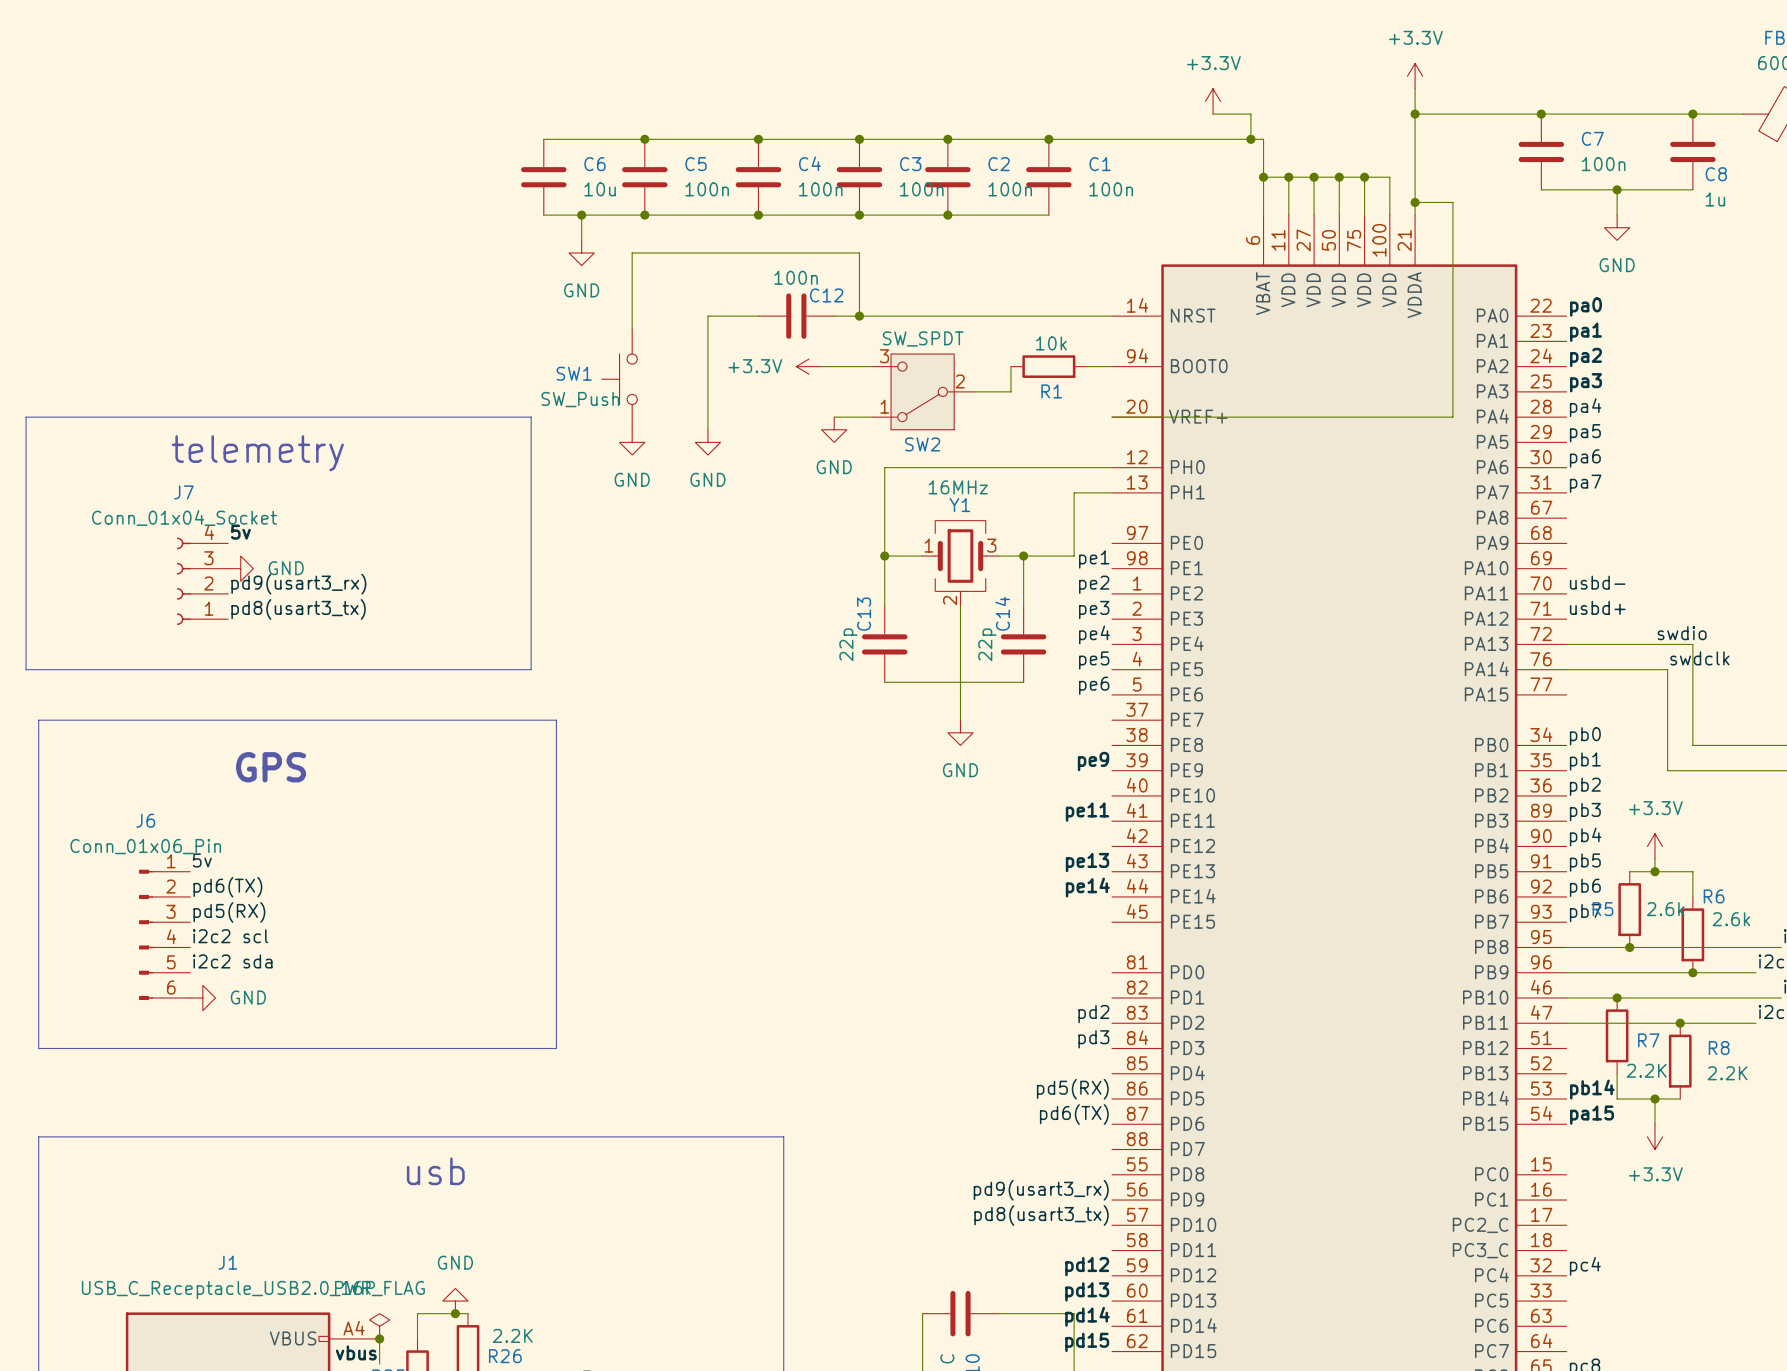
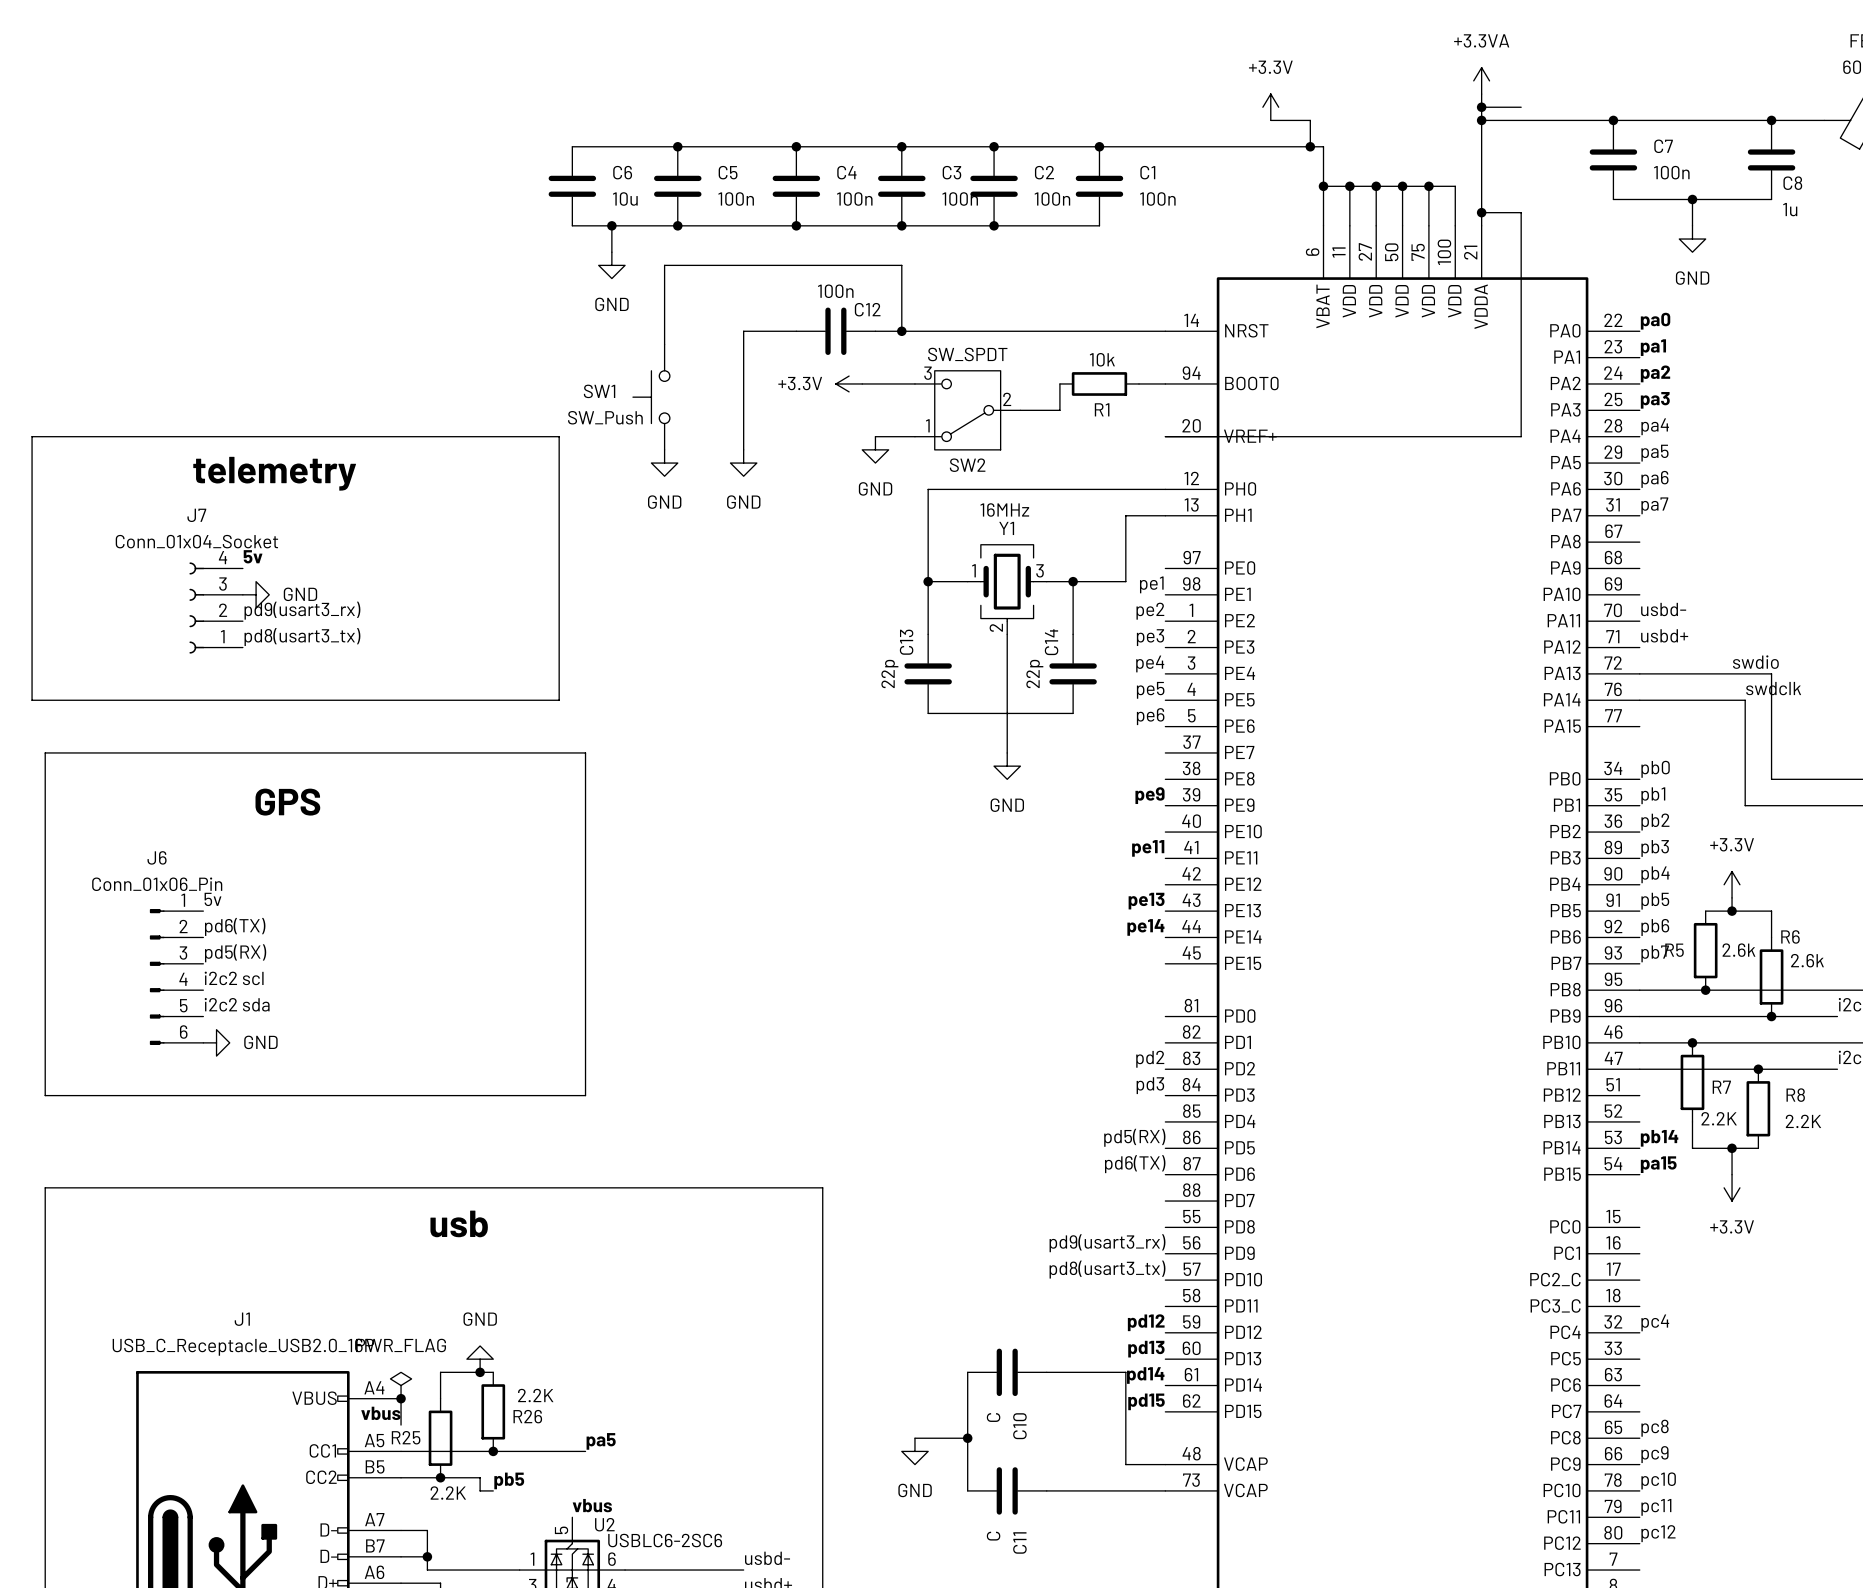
power symbol: +3.3V (1415, 76) -> +3.3VA (1481, 80)
wire: none -> (1481, 107) (1521, 107)
junction: none -> (1481, 107)

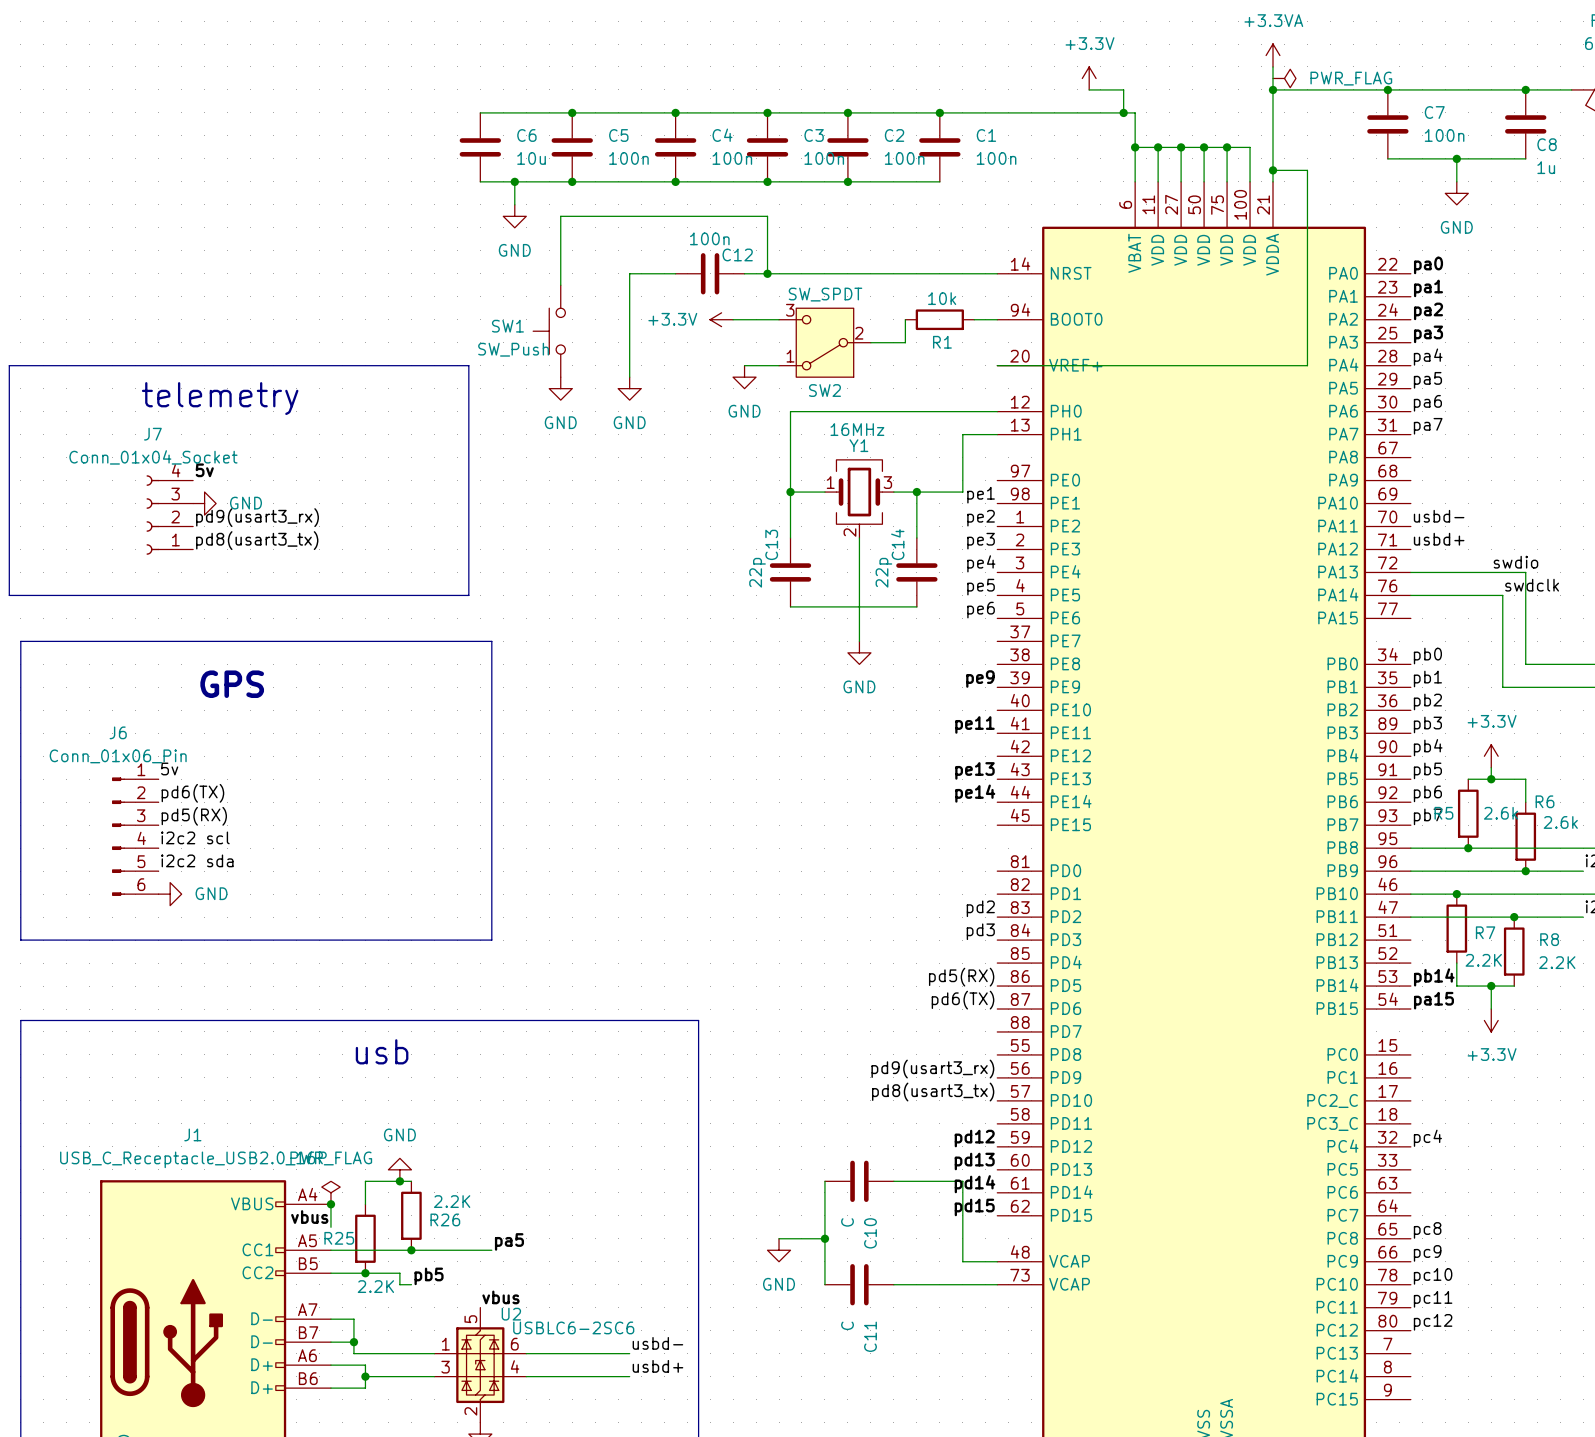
wire: (1481, 107) (1521, 107) -> none
junction: (1481, 107) -> none
power symbol: none -> PWR_FLAG (1284, 78)

